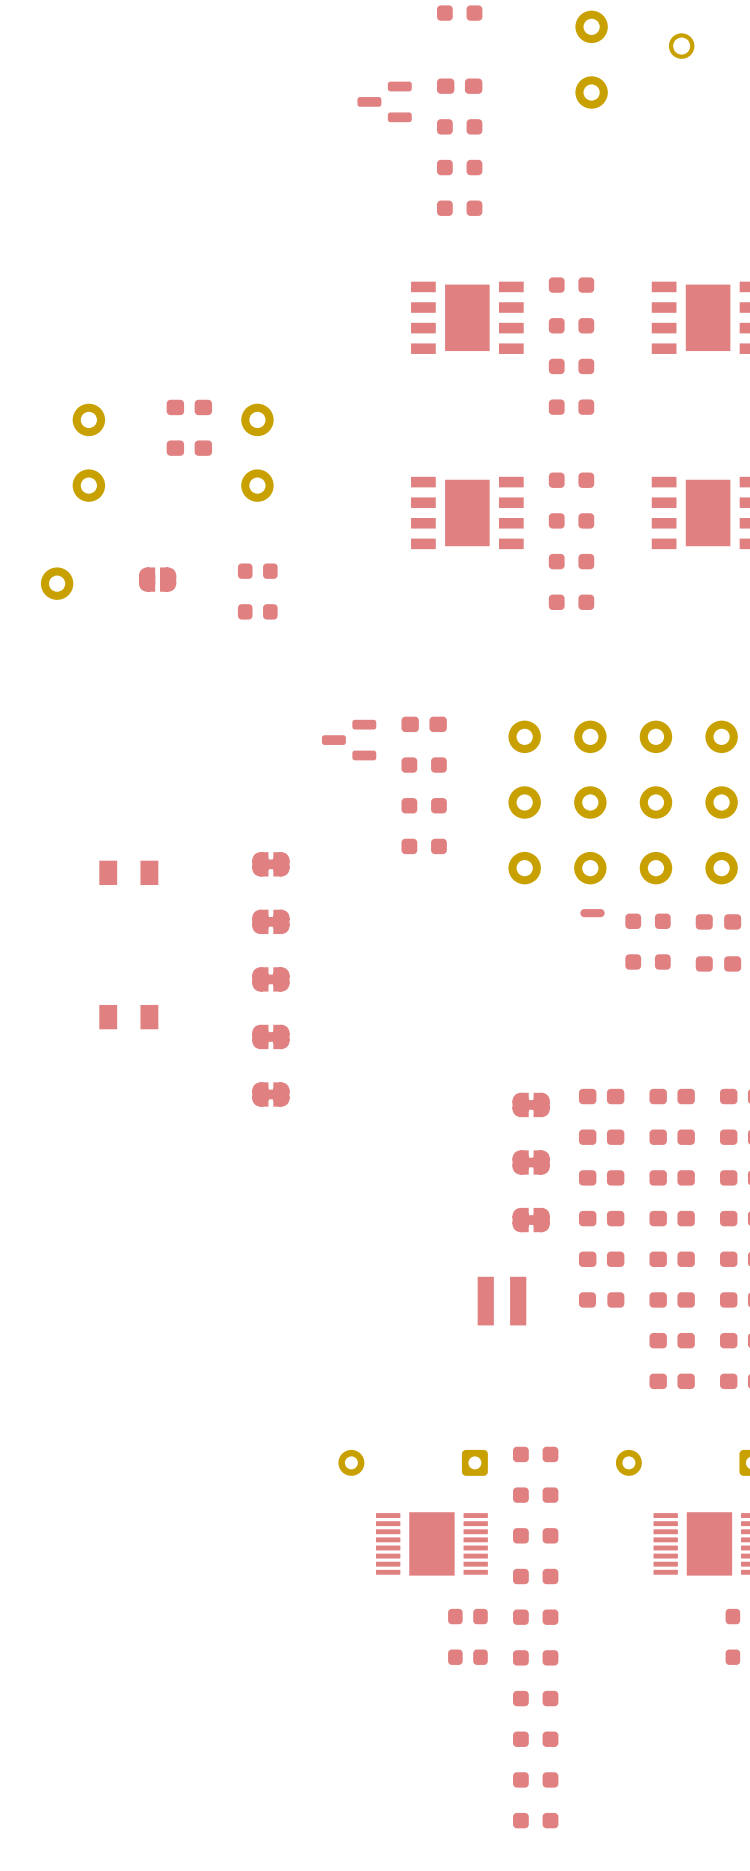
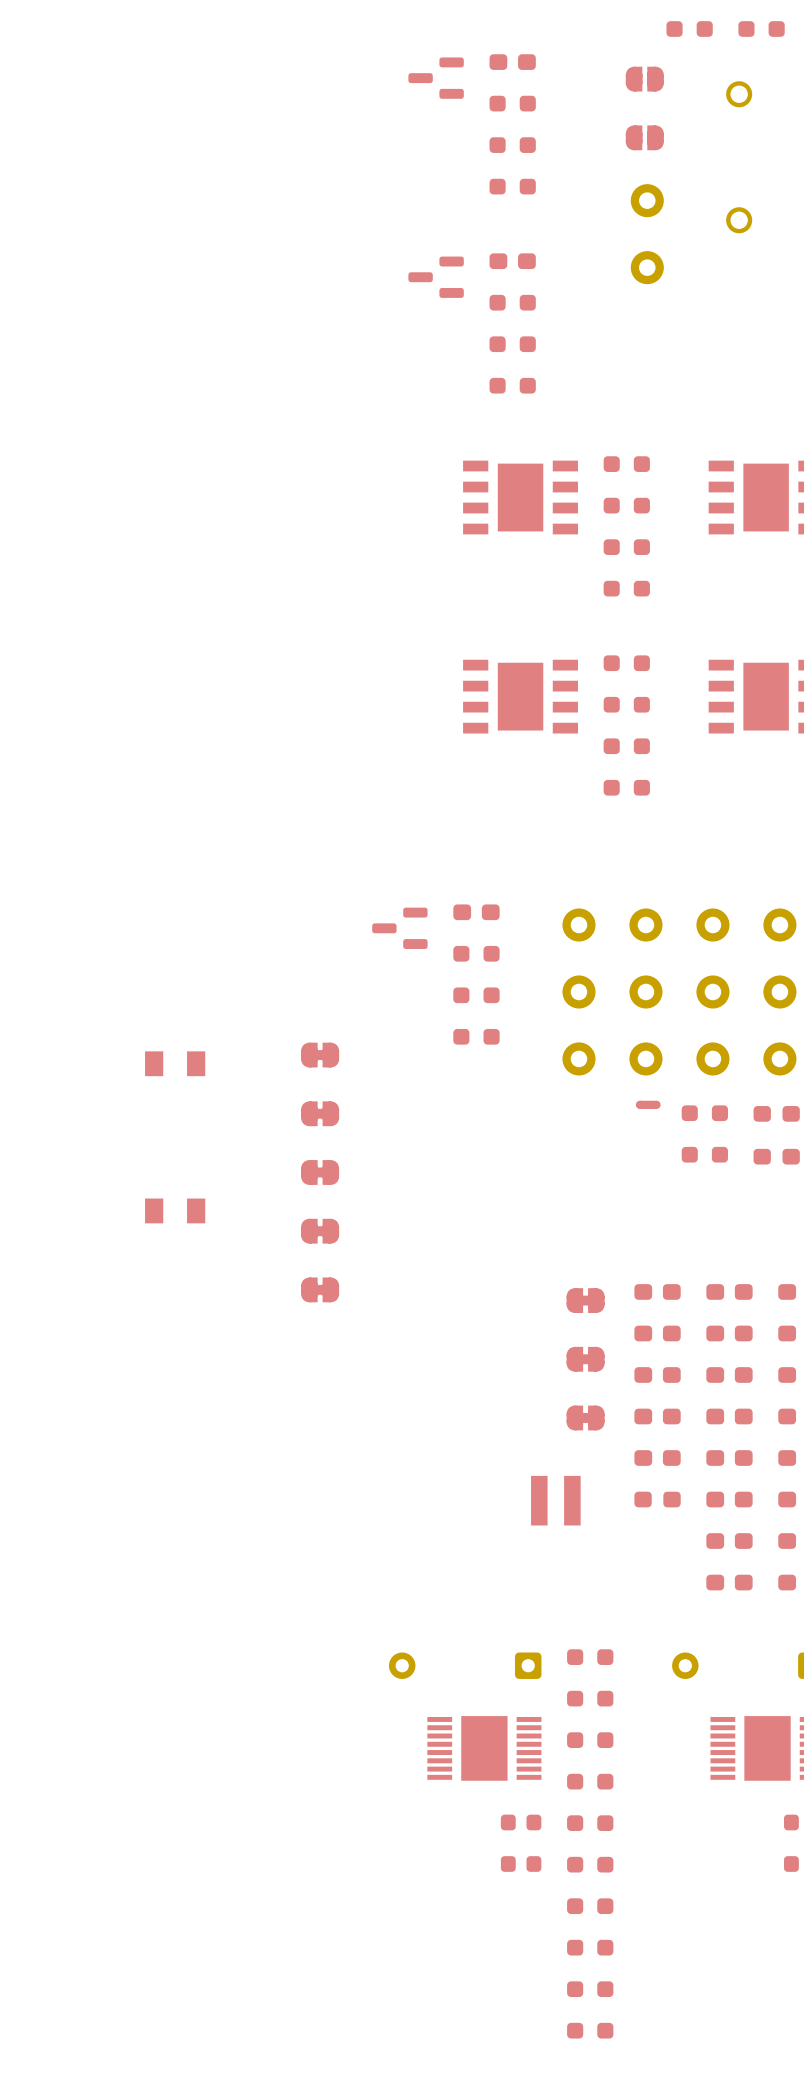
part: (189, 407) -> none
part: (88, 419) -> none
part: (257, 419) -> none
part: (189, 448) -> none
part: (88, 485) -> none
part: (257, 485) -> none
part: (257, 571) -> none
part: (157, 579) -> none
part: (57, 583) -> none
part: (257, 611) -> none

